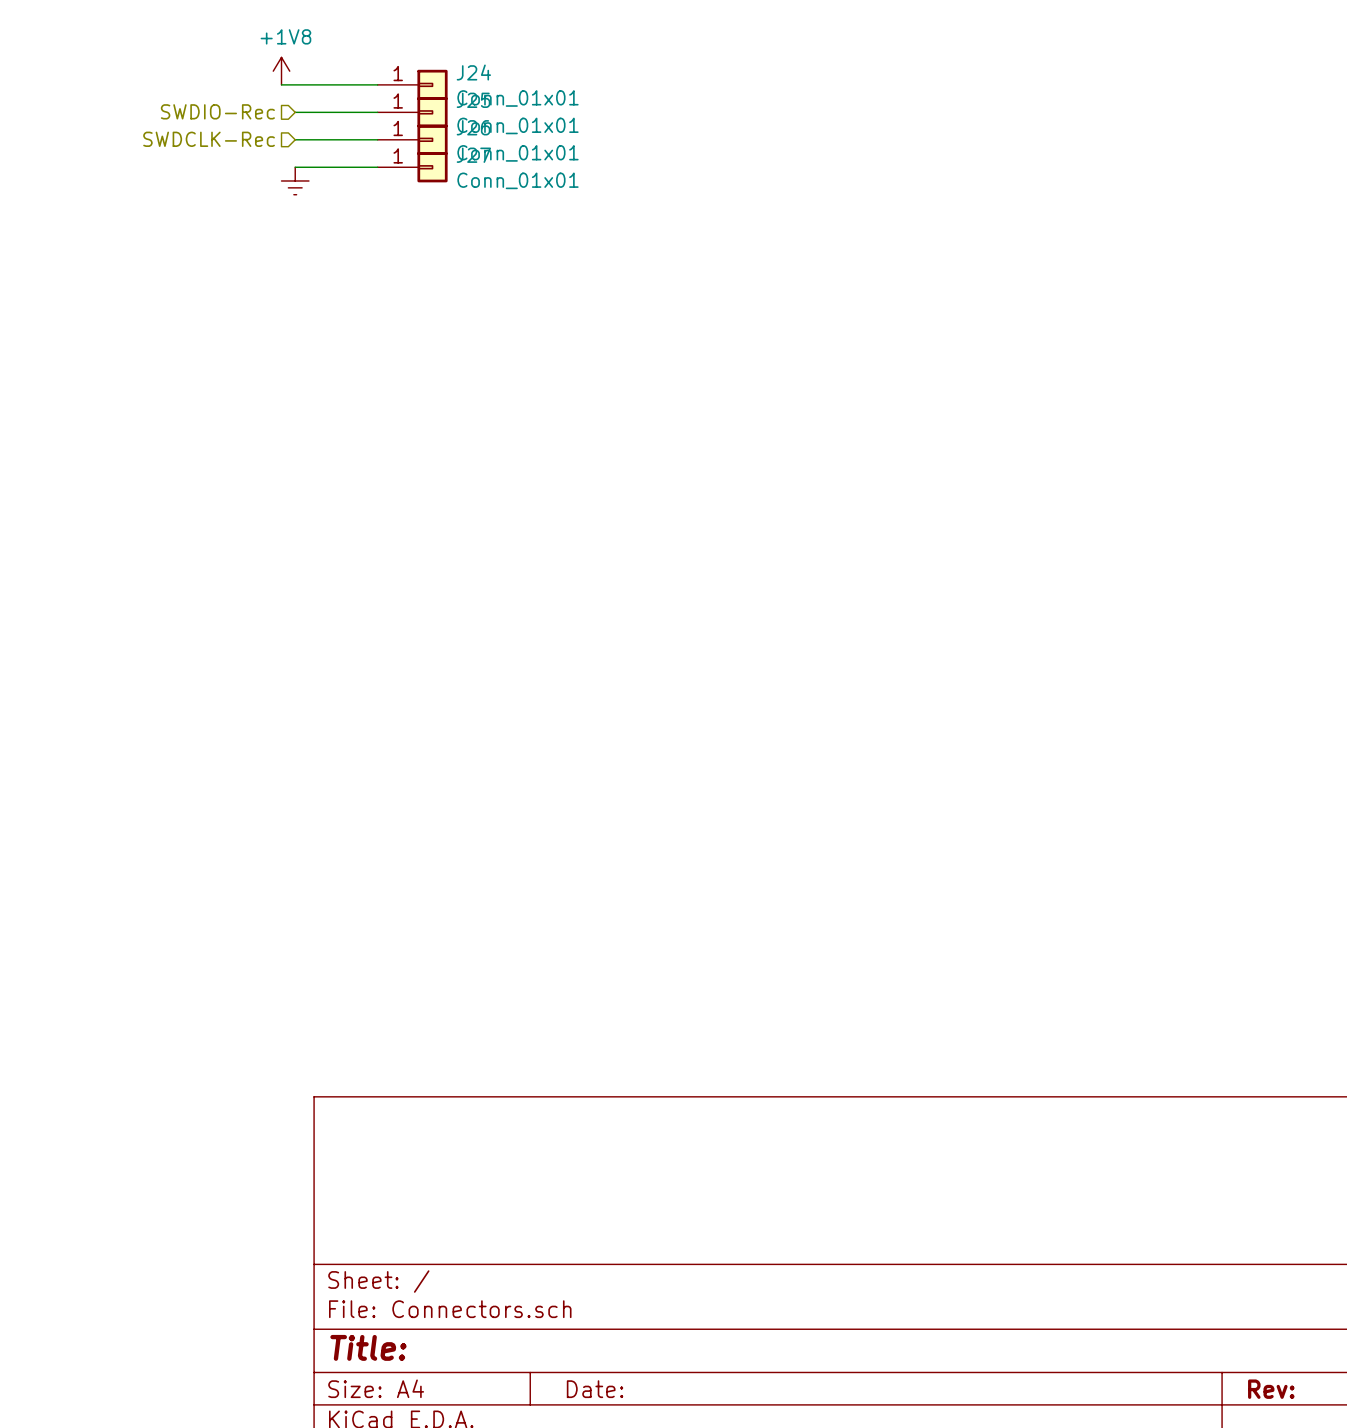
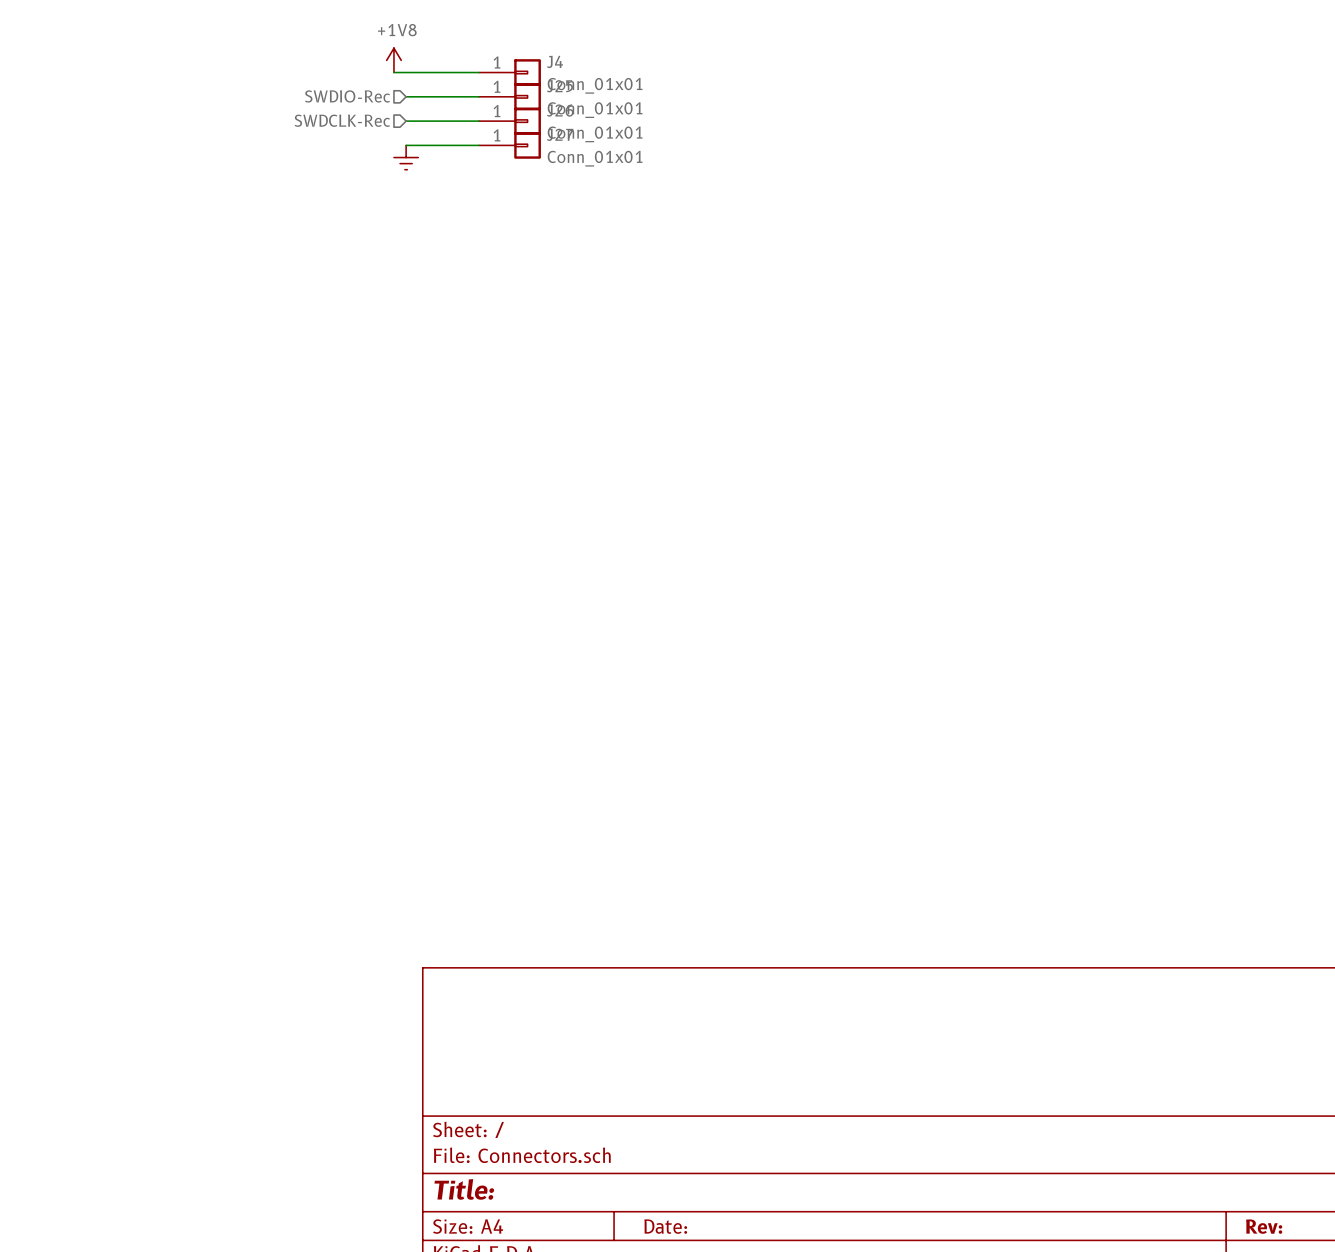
J24 name: J24 (473, 72) -> J4 (554, 61)

